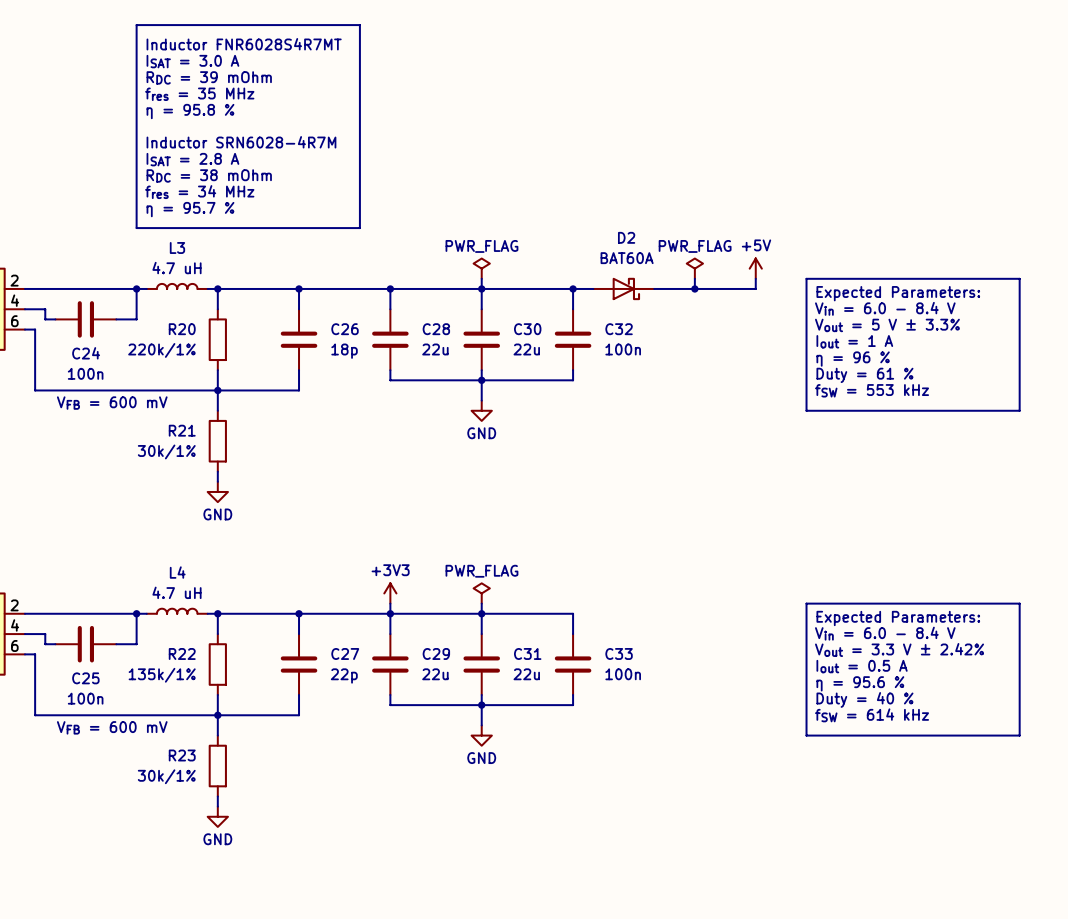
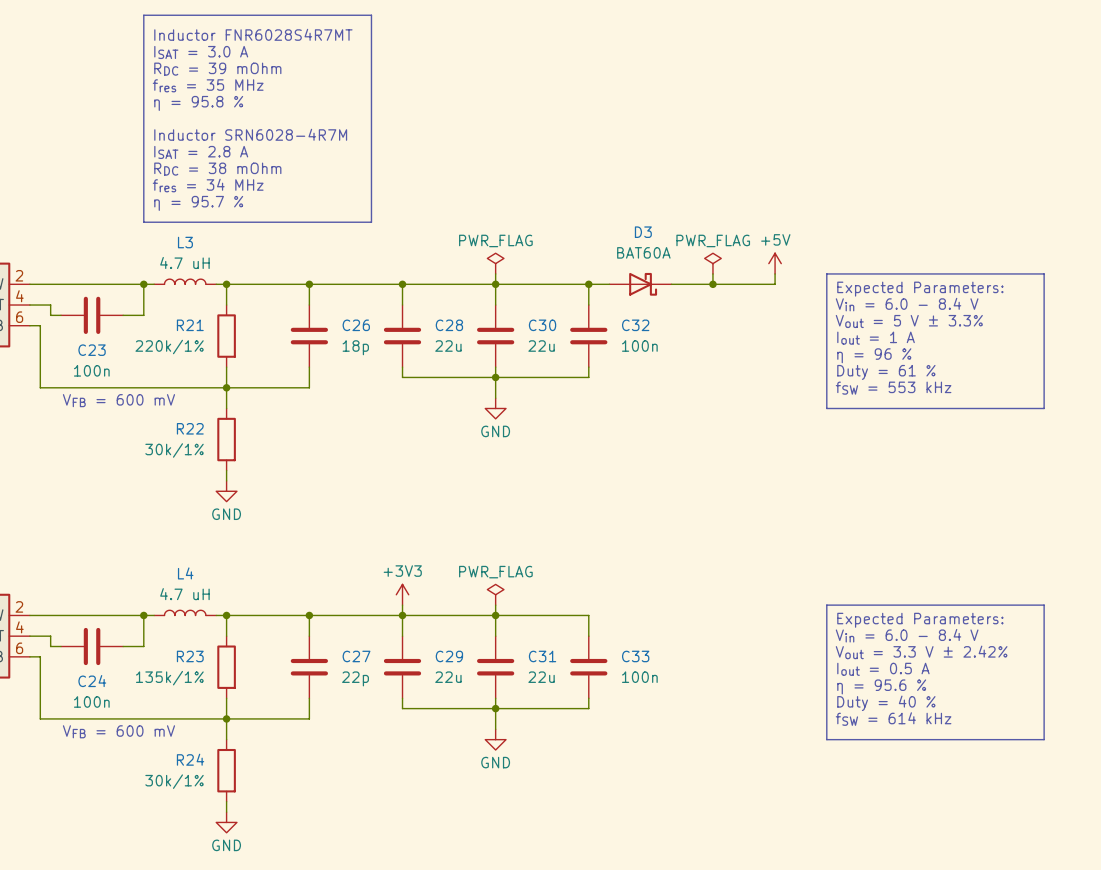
D2 name: D2 (626, 237) -> D3 (643, 232)
R20 name: R20 (182, 329) -> R21 (190, 325)
C24 name: C24 (86, 353) -> C23 (92, 350)
R21 name: R21 (182, 430) -> R22 (190, 428)
R22 name: R22 (182, 653) -> R23 (190, 656)
C25 name: C25 (85, 678) -> C24 (92, 681)
R23 name: R23 (182, 755) -> R24 (190, 759)

